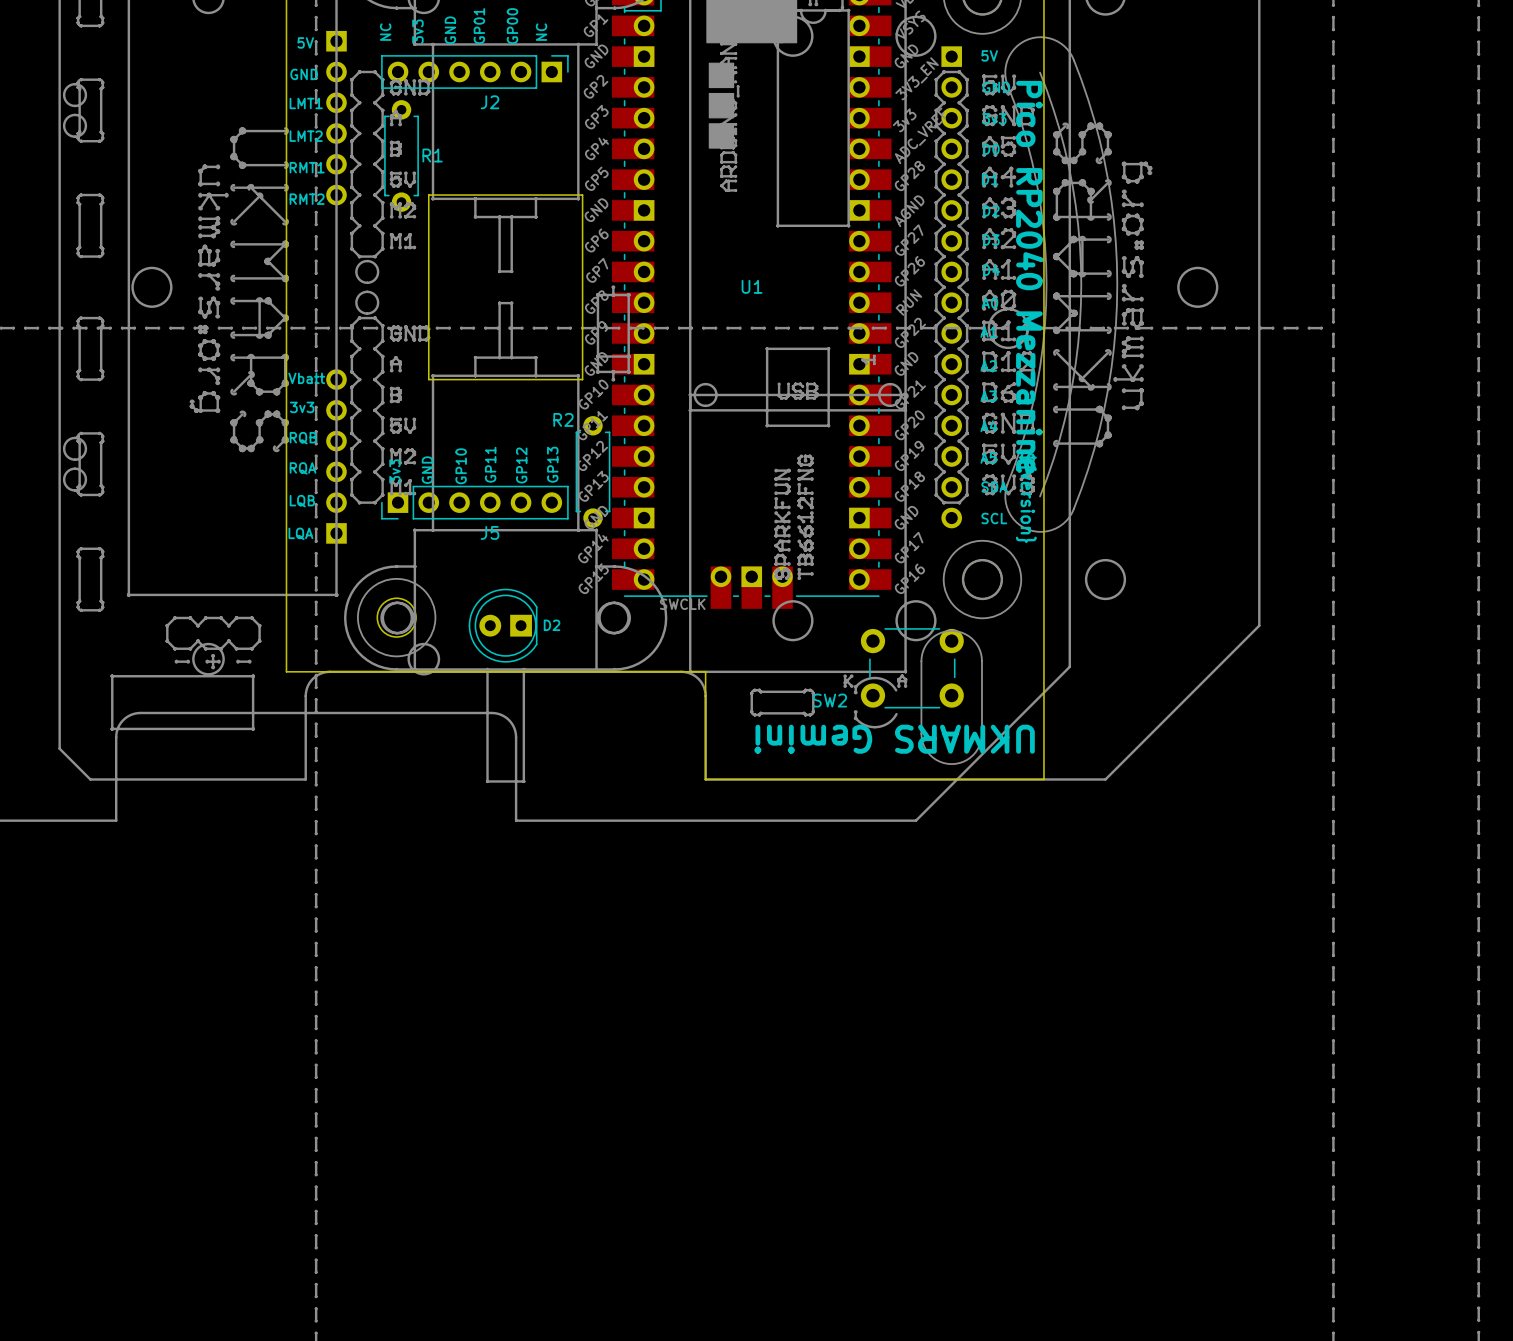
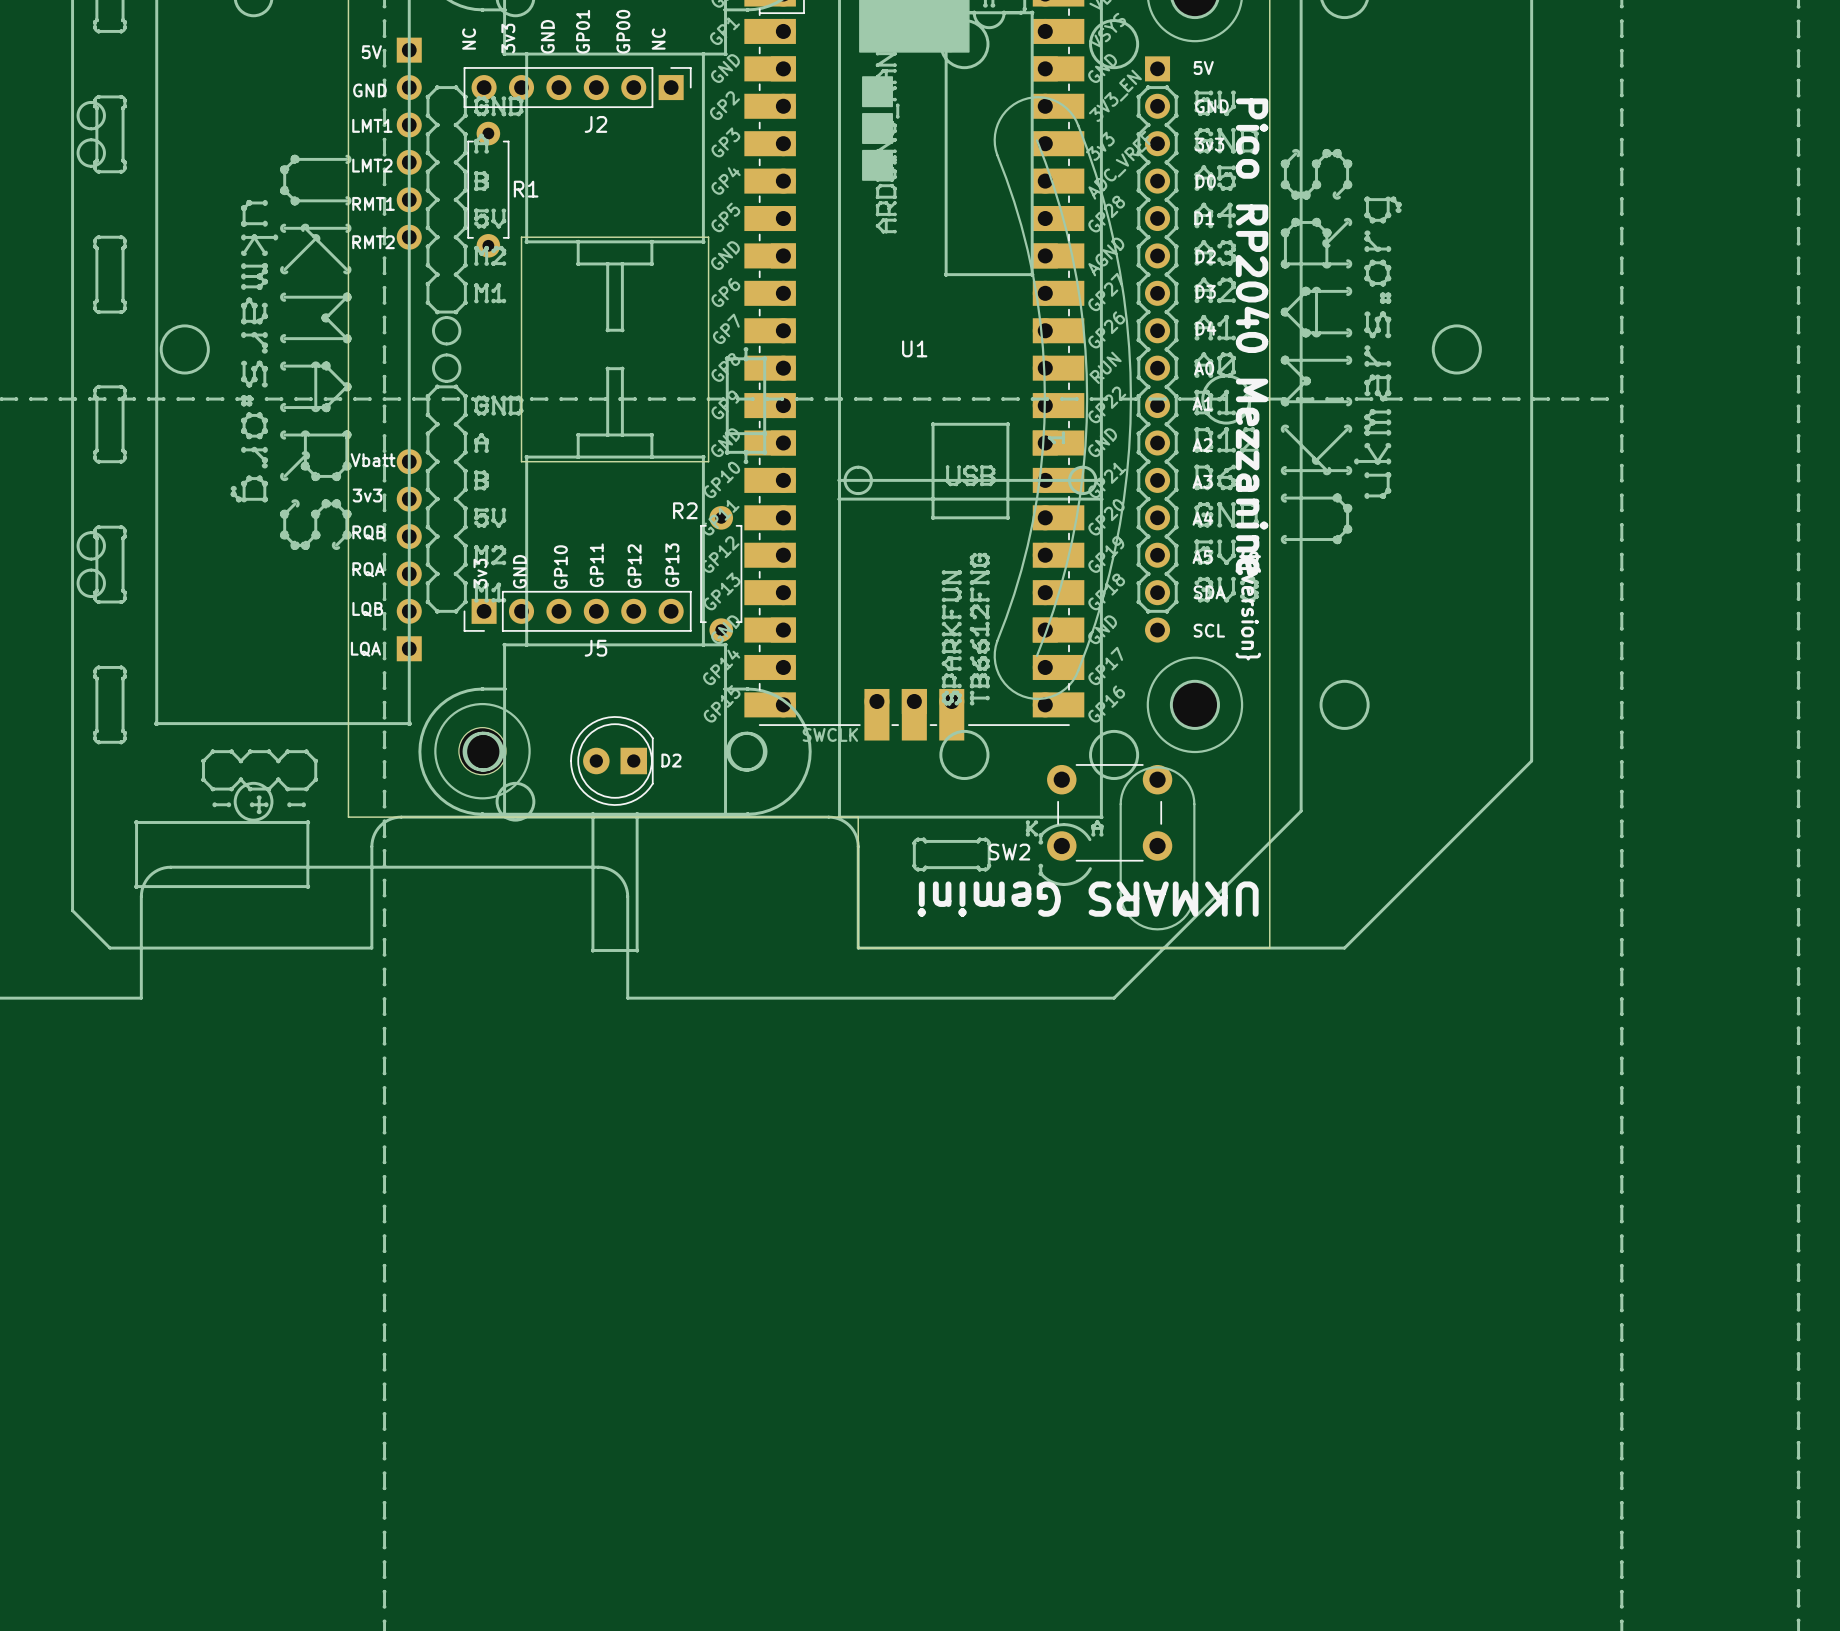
line: (1074, 60) (1067, 49) (1057, 41) (1049, 38) (1036, 37) (1024, 41) (1014, 48) (1009, 55) (1005, 67) (1006, 80) (1027, 142) (1036, 182) (1042, 223) (1046, 284) (1044, 325) (1036, 386) (1027, 426) (1006, 488) (1005, 498) (1008, 511) (1016, 522) (1028, 529) (1037, 531) (1055, 528) (1066, 520) (1072, 512) (1081, 489) (1104, 408) (1115, 326) (1116, 263) (1111, 201) (1094, 119) (1074, 60) -> (1078, 125) (1070, 112) (1058, 102) (1043, 97) (1033, 97) (1018, 101) (1009, 107) (999, 119) (995, 134) (995, 150) (1021, 225) (1032, 274) (1042, 348) (1044, 398) (1040, 472) (1032, 521) (1021, 570) (995, 646) (994, 657) (998, 674) (1004, 683) (1017, 694) (1034, 698) (1050, 696) (1069, 684) (1076, 675) (1087, 646) (1102, 598) (1115, 549) (1123, 499) (1129, 448) (1130, 372) (1123, 296) (1115, 246) (1102, 197) (1078, 125)
line: (1040, 72) (1059, 128) (1072, 186) (1079, 245) (1081, 284) (1078, 343) (1072, 382) (1059, 440) (1040, 496) -> (1037, 140) (1053, 185) (1072, 255) (1083, 326) (1087, 398) (1083, 469) (1072, 541) (1060, 587) (1037, 655)

